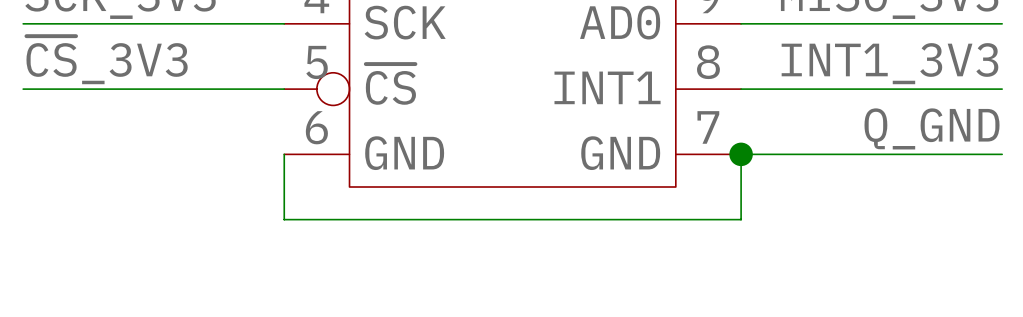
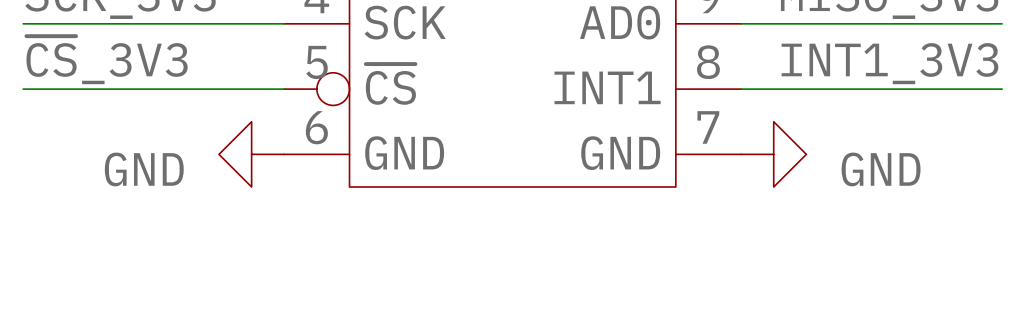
label: Q_GND (932, 128) -> none
power symbol: none -> GND (251, 154)
wire: (284, 154) (284, 219) (741, 219) (741, 154) (1002, 154) -> none
junction: (741, 154) -> none
power symbol: none -> GND (773, 154)

